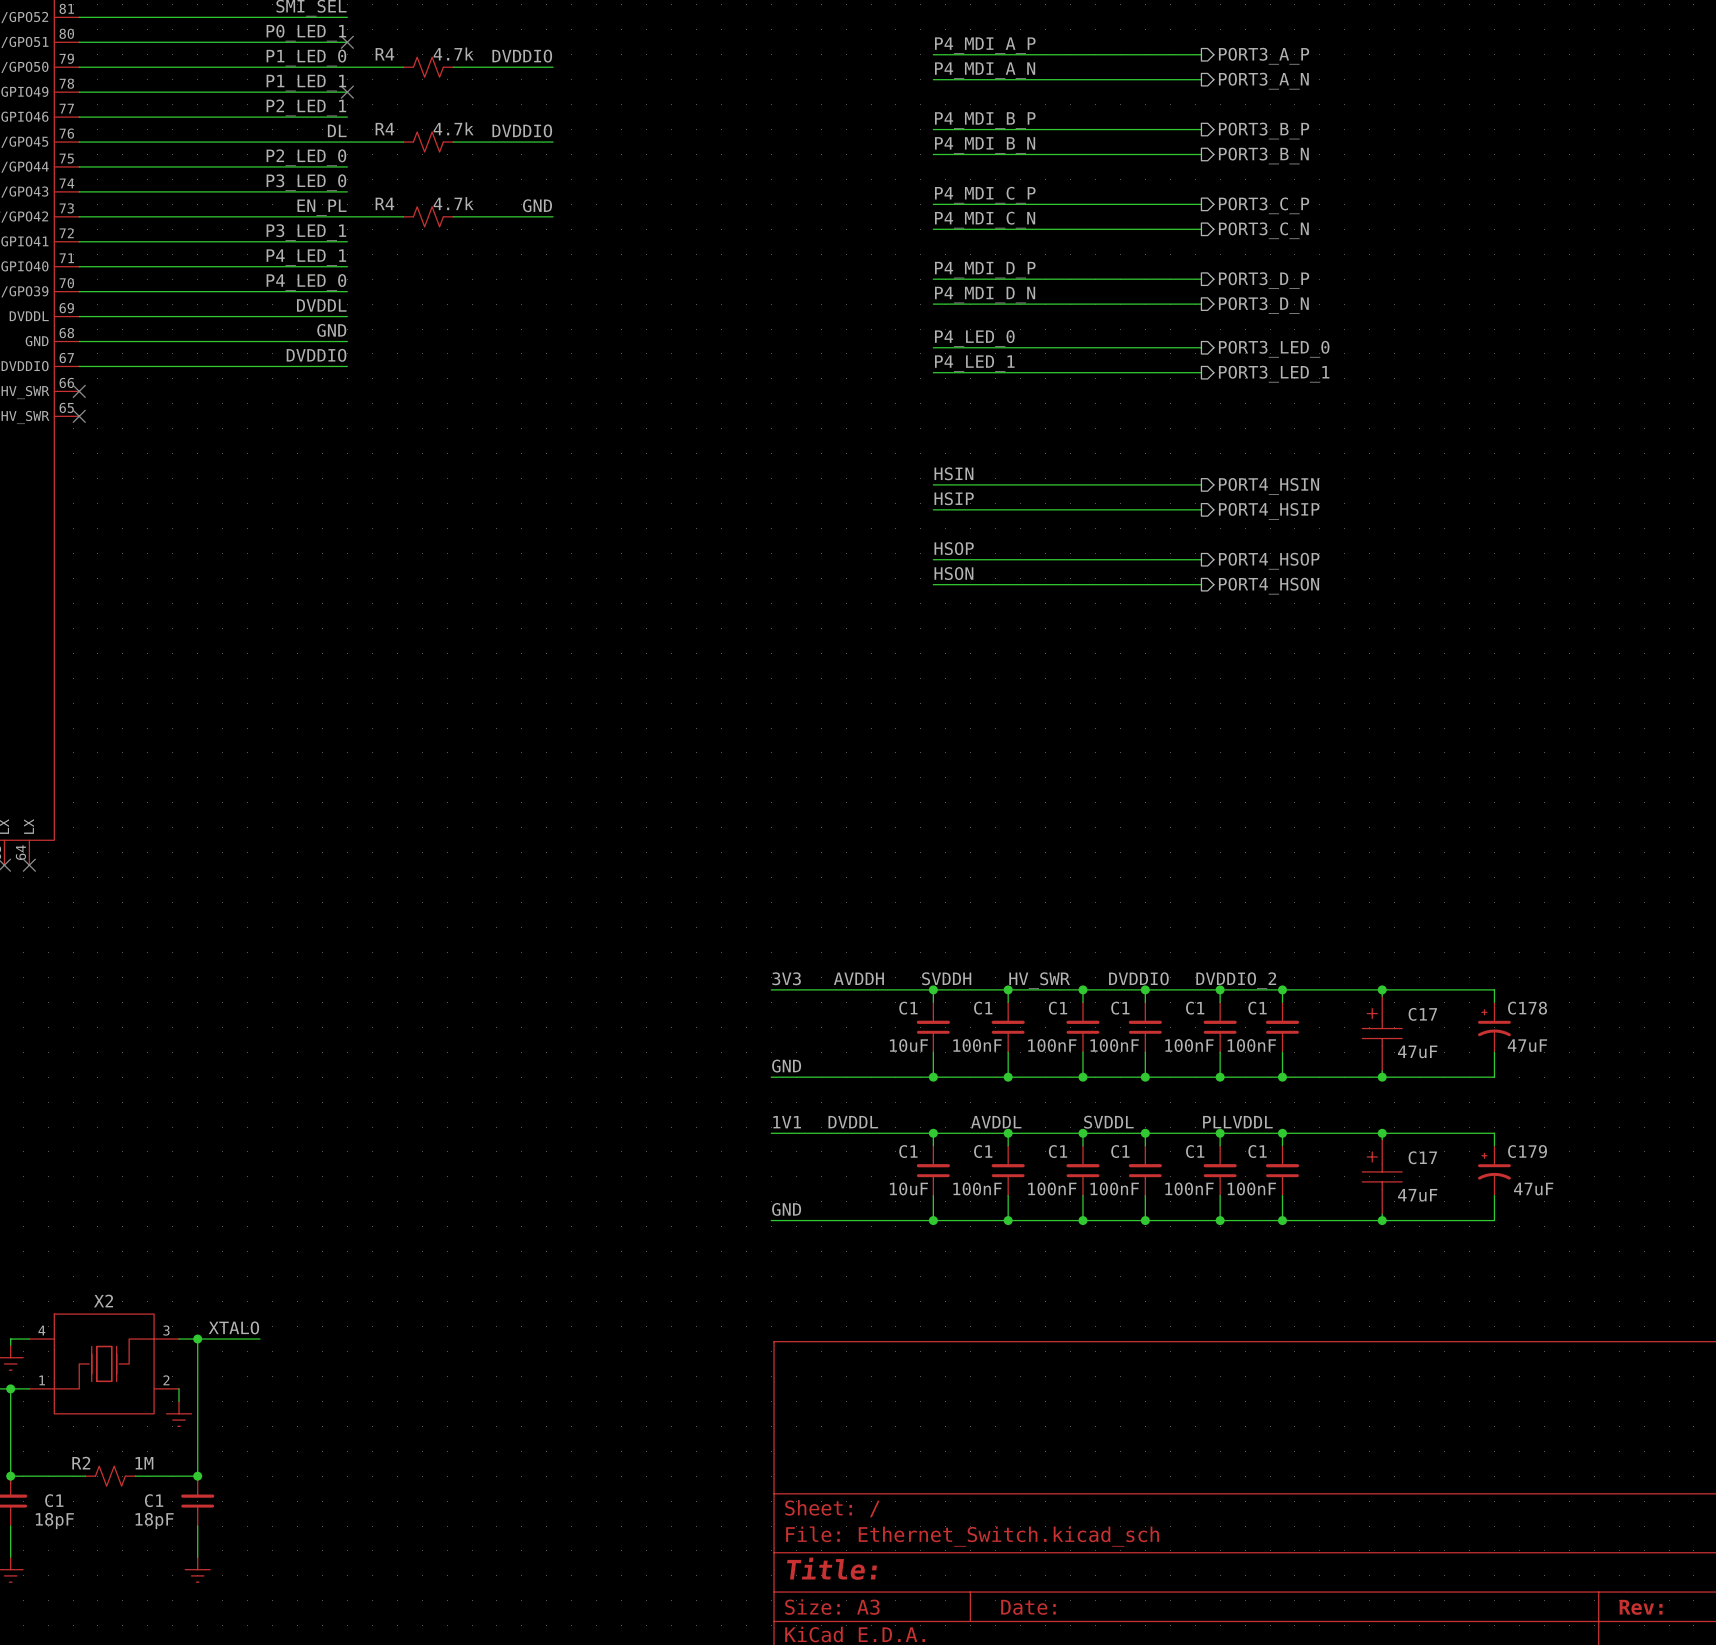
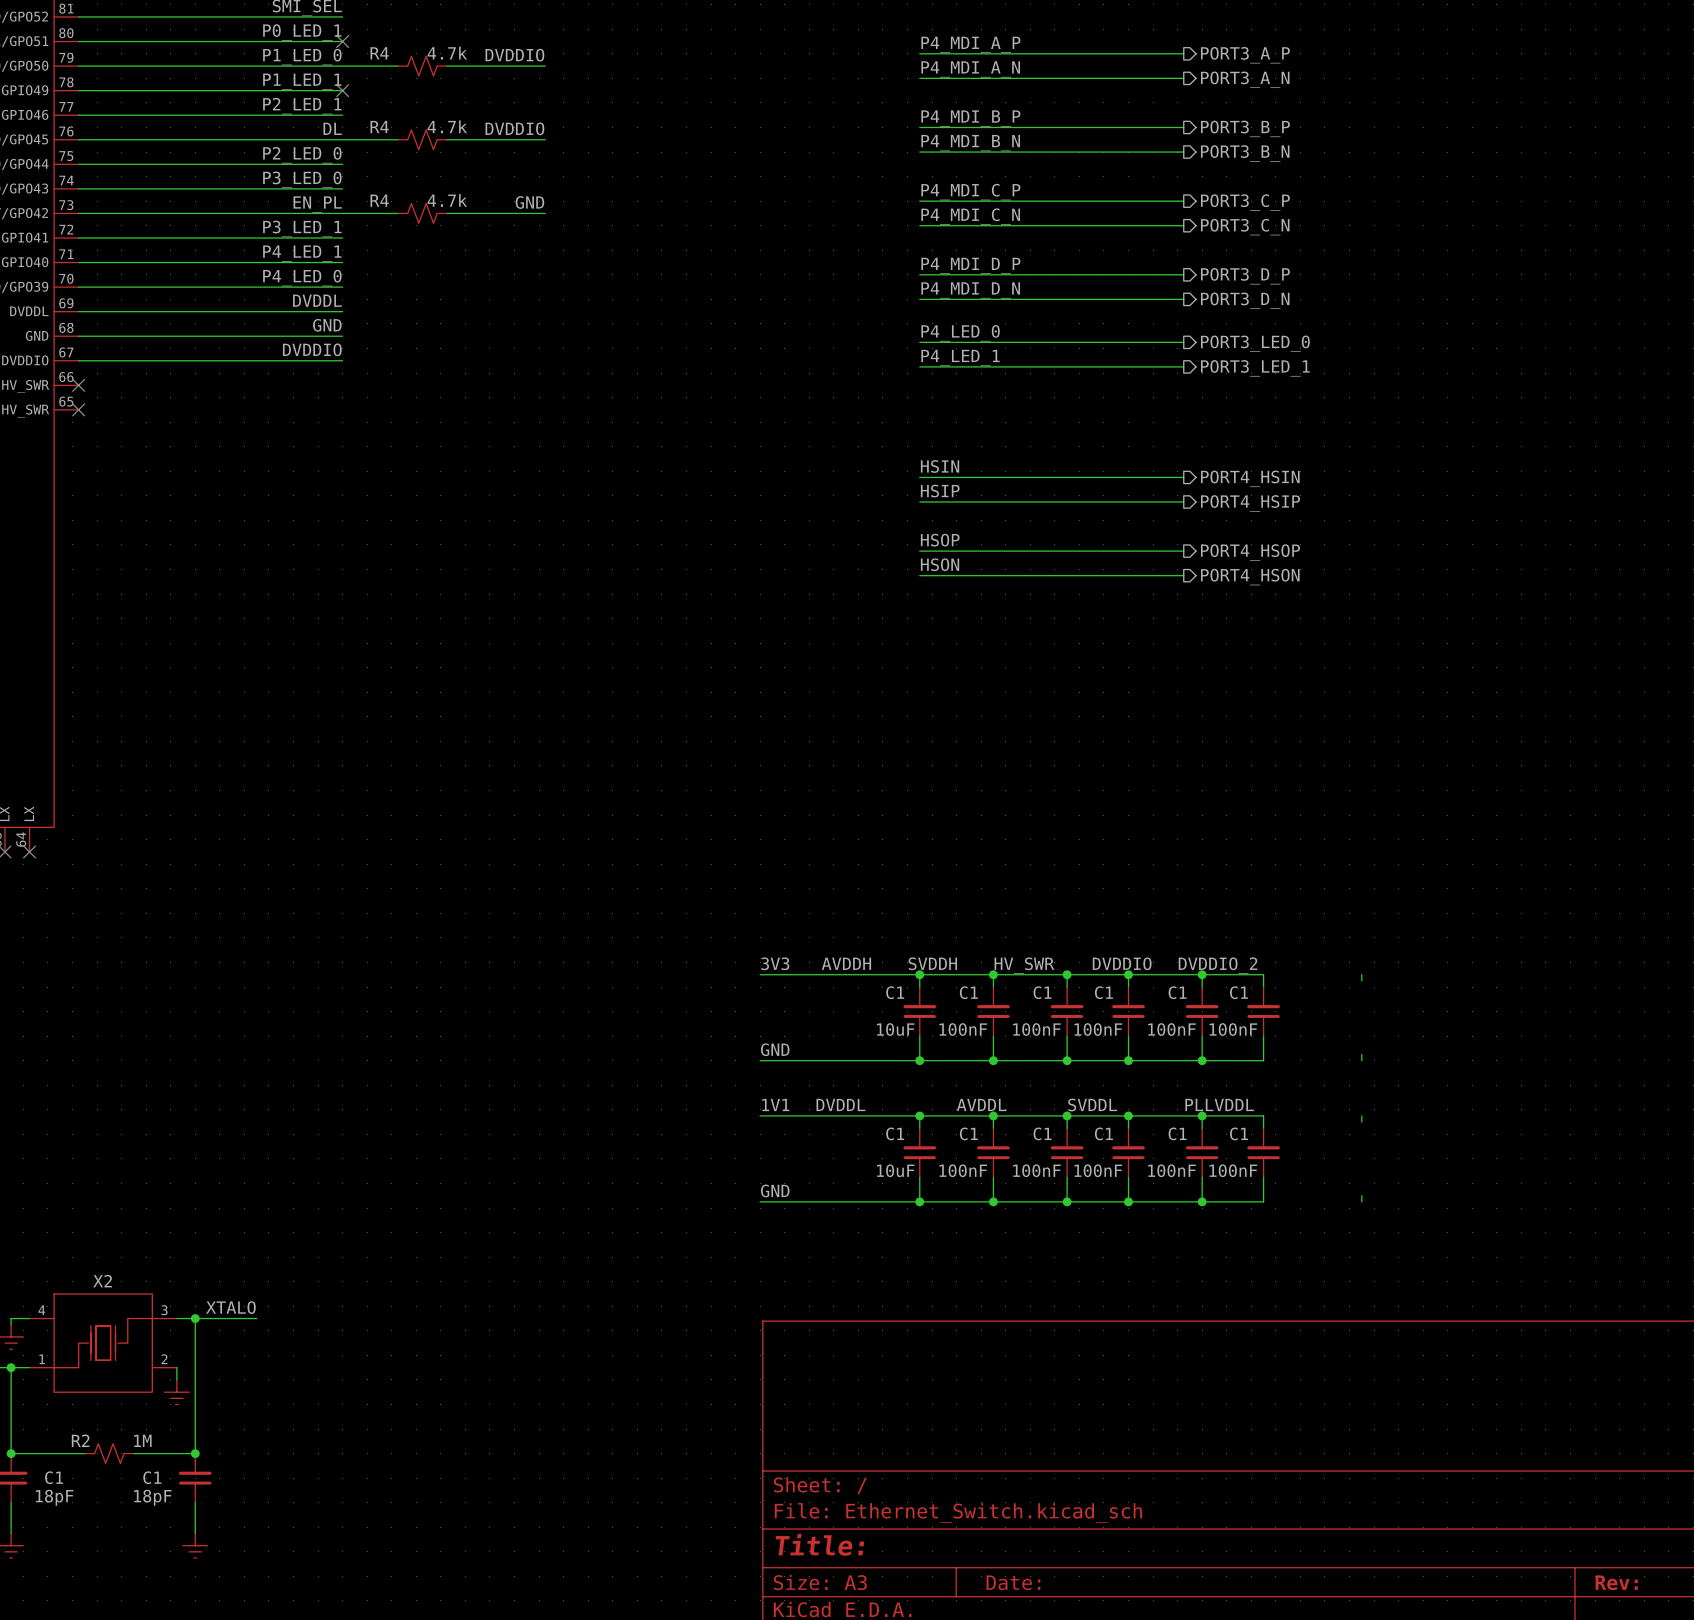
wire: (1282, 989) (1494, 989) (1494, 1002) -> none
junction: (1282, 989) -> none
junction: (1382, 989) -> none
C178: 47uF (1494, 1027) -> none
C17: 47uF (1382, 1033) -> none
wire: (1494, 1052) (1494, 1077) (1282, 1077) -> none
junction: (1282, 1077) -> none
junction: (1382, 1077) -> none
wire: (1282, 1133) (1494, 1133) (1494, 1145) -> none
junction: (1282, 1133) -> none
junction: (1382, 1133) -> none
C179: 47uF (1494, 1170) -> none
C17: 47uF (1382, 1176) -> none
wire: (1494, 1195) (1494, 1220) (1282, 1220) -> none
junction: (1282, 1220) -> none
junction: (1382, 1220) -> none

